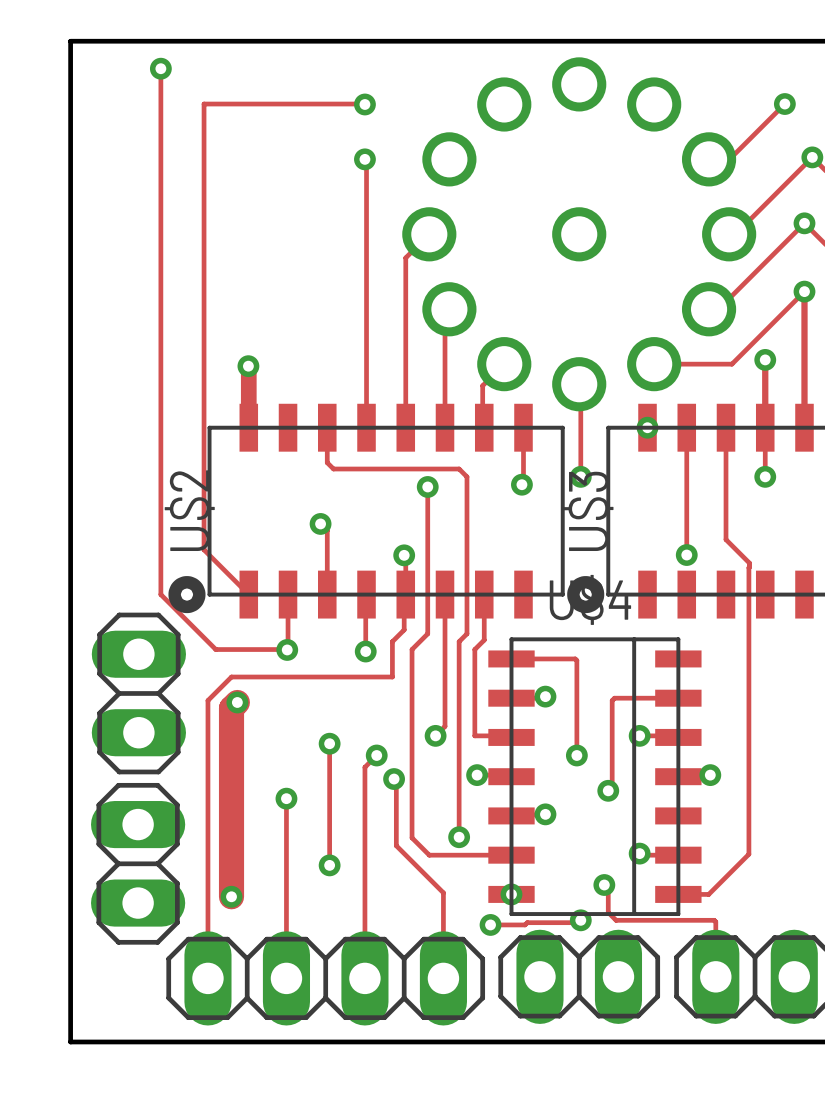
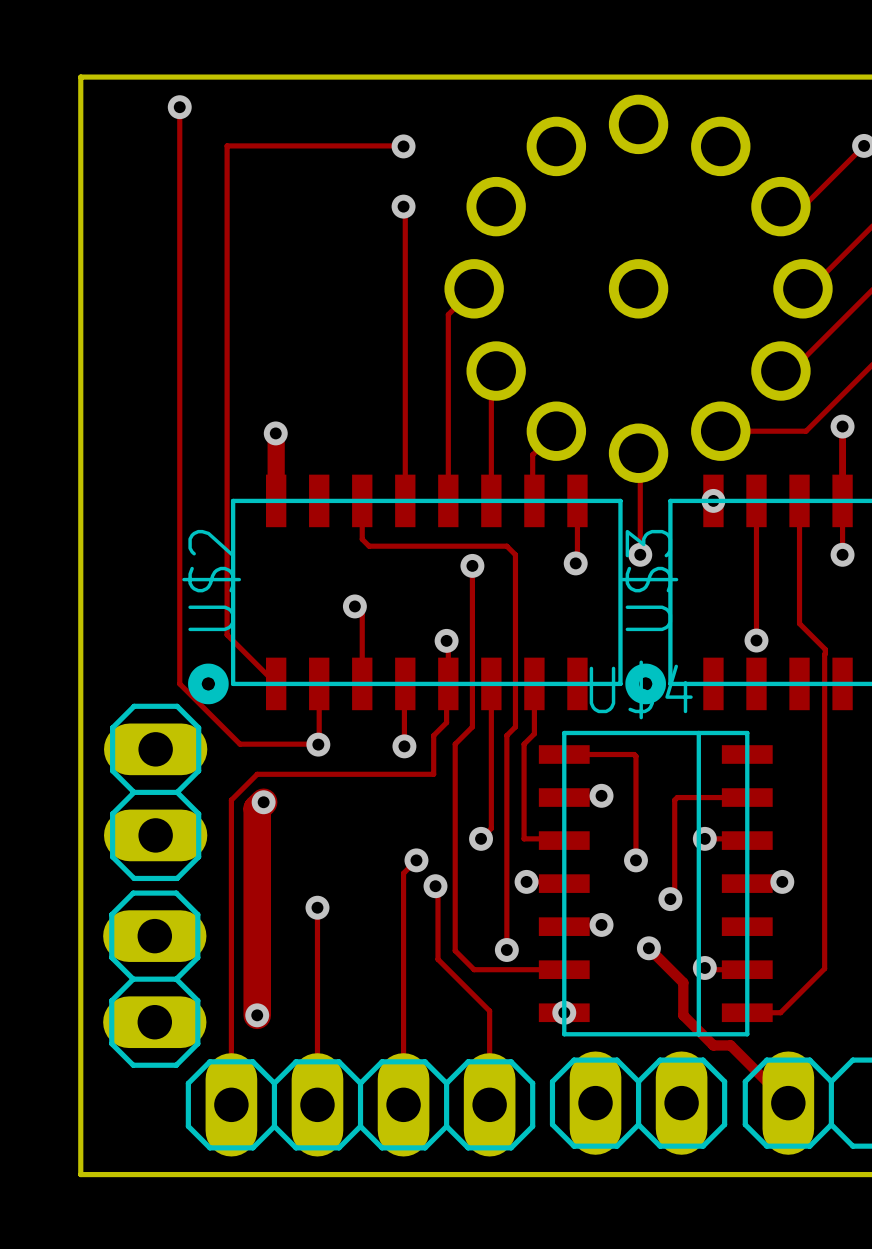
track: (329, 743) (329, 865) -> none
via: (329, 743) -> none
via: none -> (648, 948)
via: (329, 865) -> none
track: (604, 885) (608, 888) (608, 912) (616, 920) (714, 920) (715, 921) (715, 976) -> (648, 948) (683, 982) (683, 1015) (713, 1045) (730, 1045) (788, 1103)
via: (604, 885) -> none
track: (580, 920) (578, 922) (490, 924) -> none
via: (580, 920) -> none
via: (490, 924) -> none

